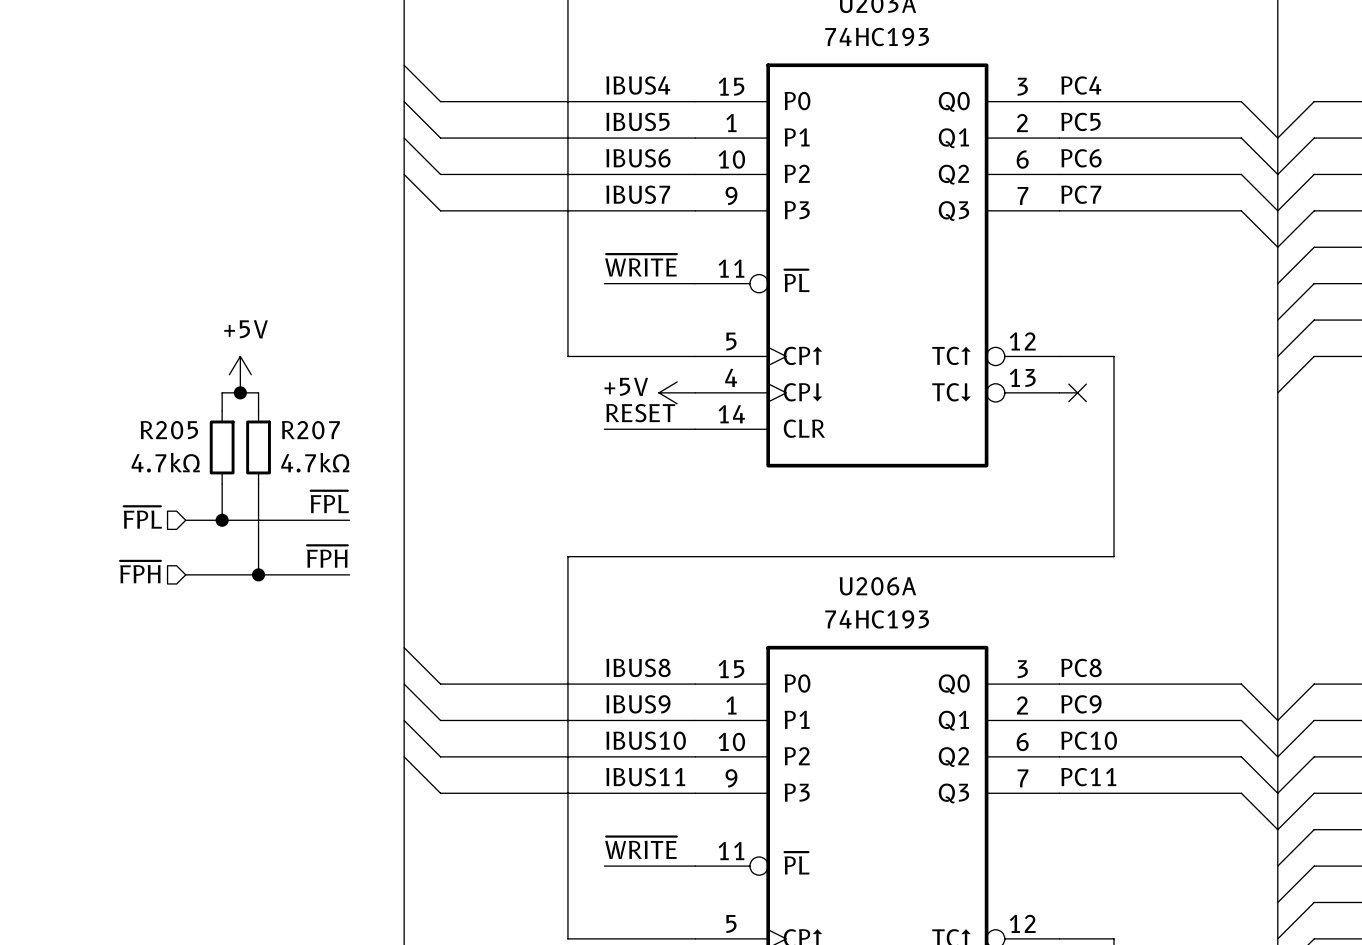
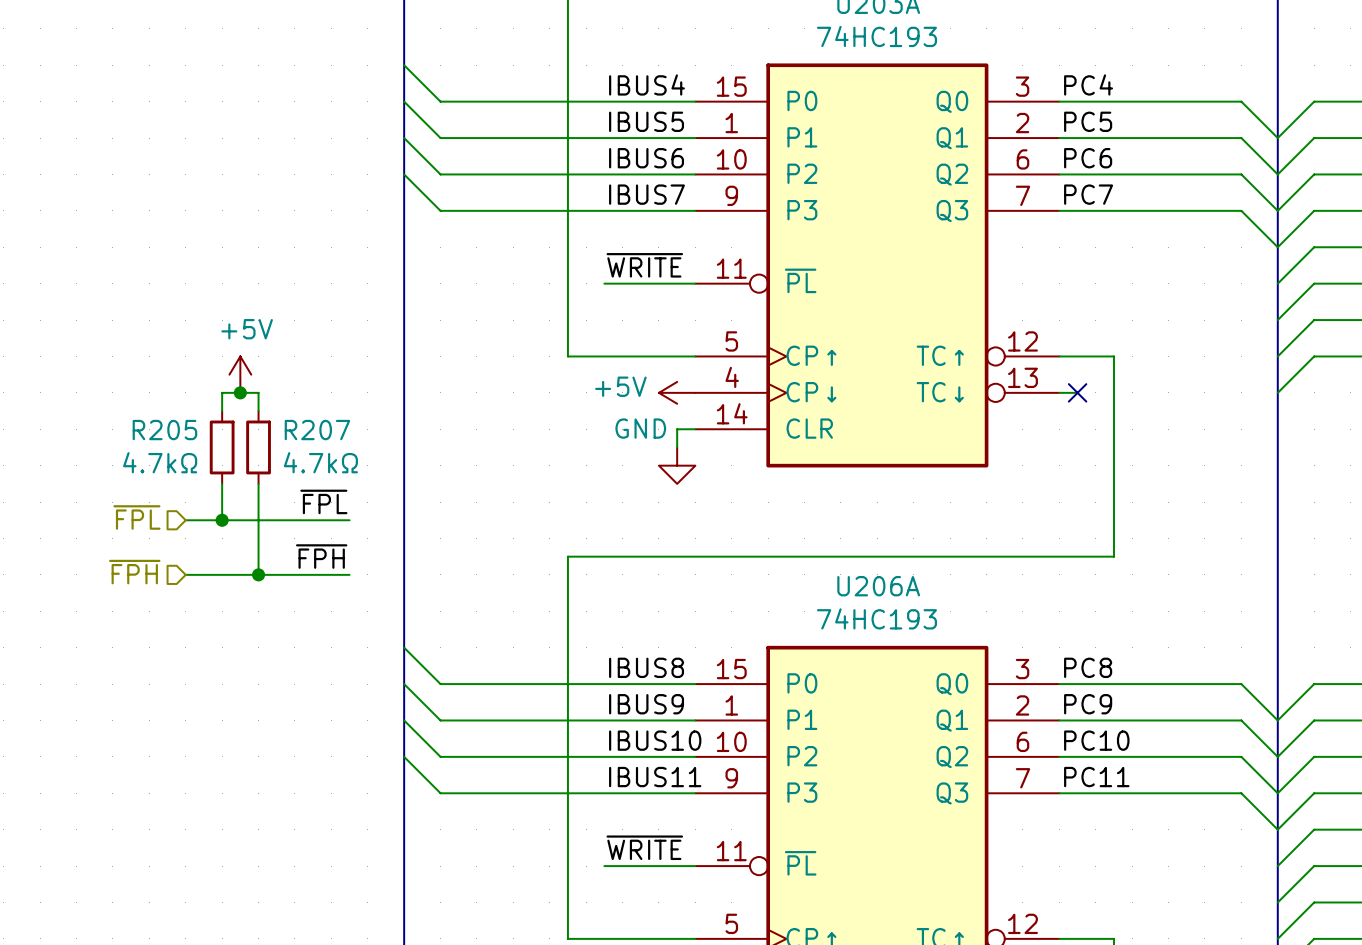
label: RESET (640, 413) -> none
wire: (604, 429) (677, 429) -> (677, 447) (677, 429)
power symbol: none -> GND (677, 465)

